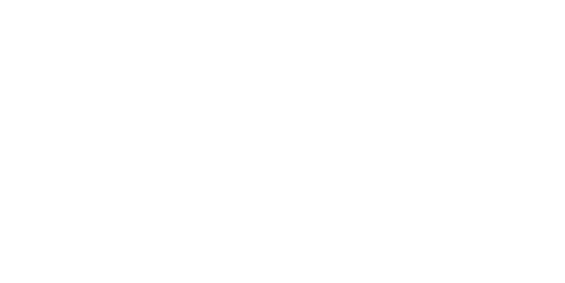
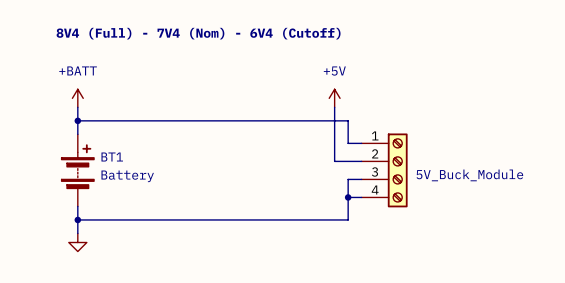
text: none -> 8V4 (Full) - 7V4 (Nom) - 6V4 (Cutoff) (198, 33)
power symbol: none -> +BATT (77, 98)
power symbol: none -> +5V (334, 98)
wire: none -> (77, 107) (77, 134)
wire: none -> (334, 107) (334, 161) (361, 161)
wire: none -> (77, 120) (348, 120) (348, 143) (361, 143)
junction: none -> (77, 120)
BT1: none -> Battery (77, 170)
5V_Buck_Module: none -> (384, 170)
wire: none -> (361, 179) (348, 179) (348, 219) (77, 219)
wire: none -> (348, 197) (361, 197)
junction: none -> (348, 197)
wire: none -> (77, 206) (77, 233)
junction: none -> (77, 219)
power symbol: none -> (77, 242)

